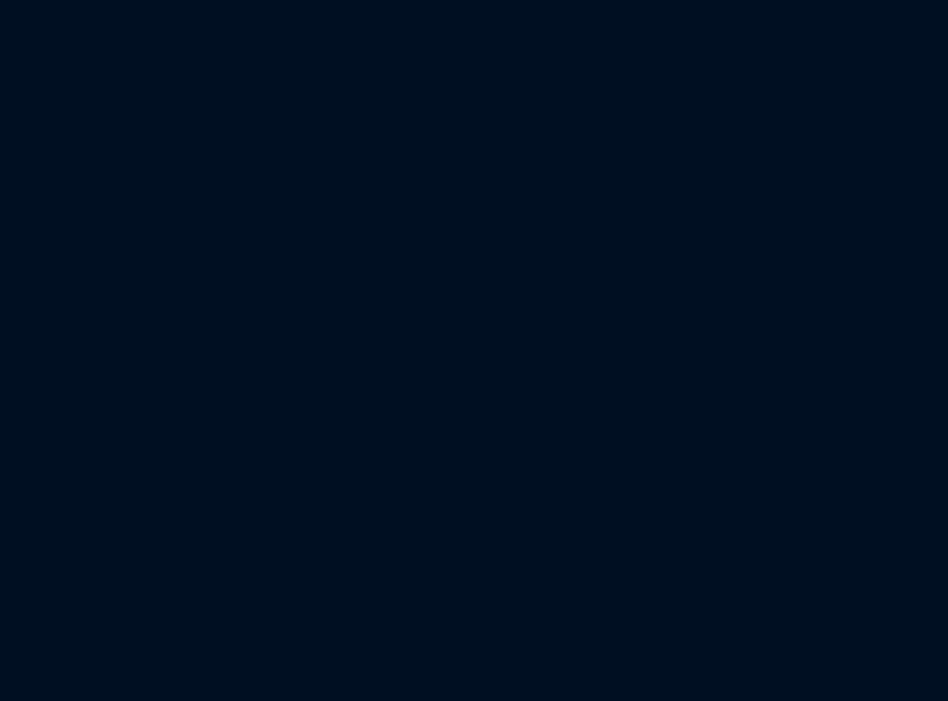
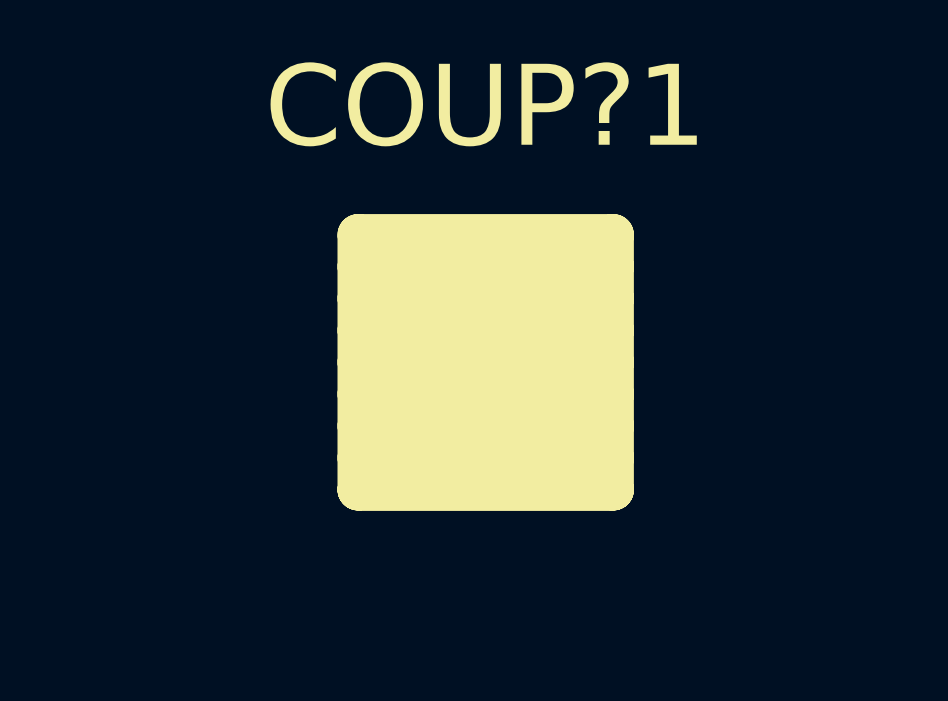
COUP?1: none -> (485, 362)

